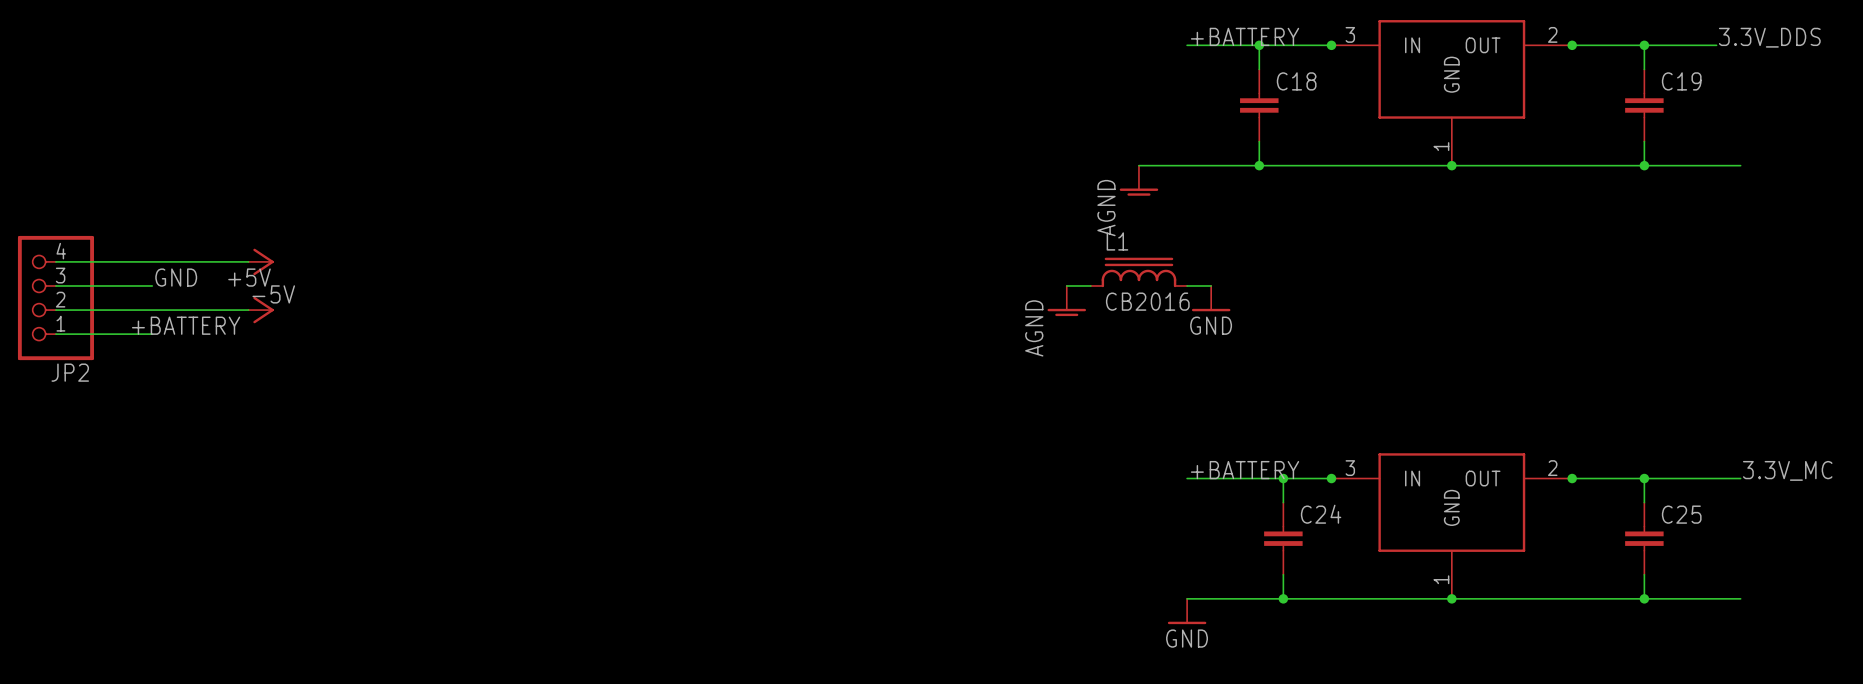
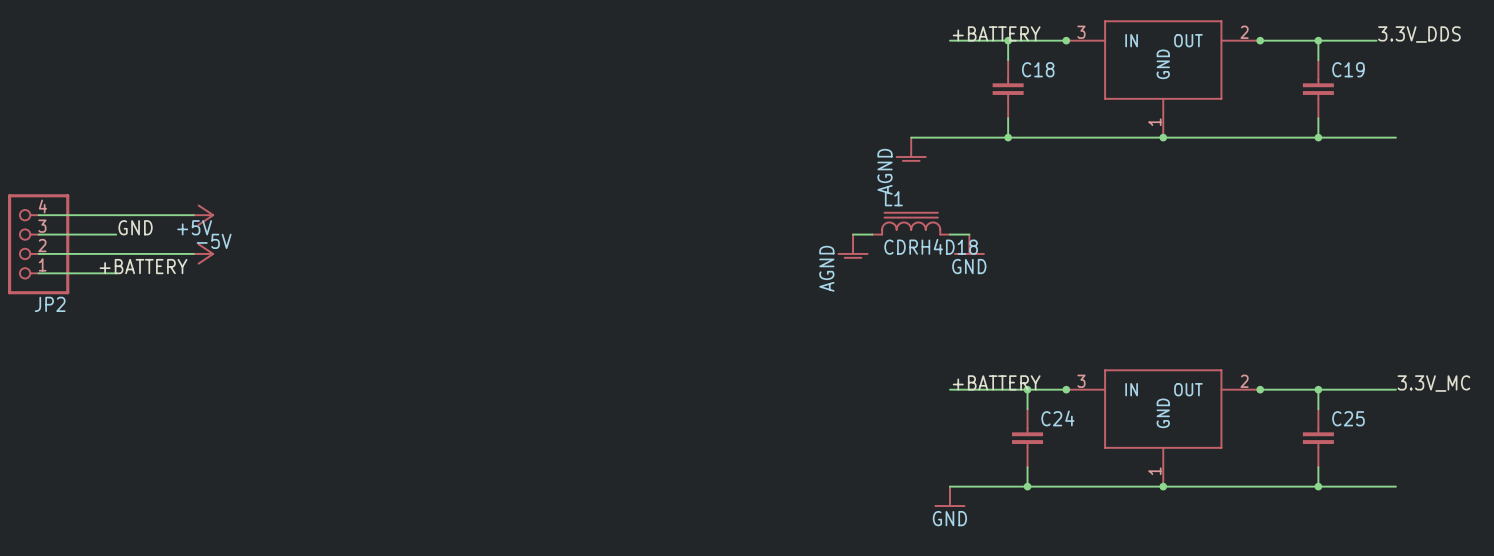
L1 value: CB2016 (1147, 301) -> CDRH4D18 (931, 246)

